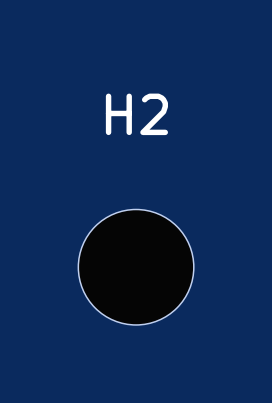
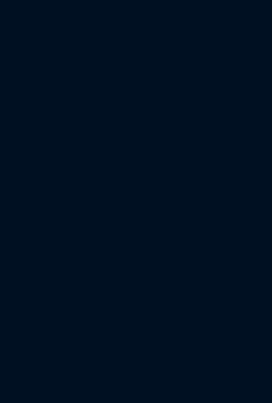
H2: (136, 267) -> none

